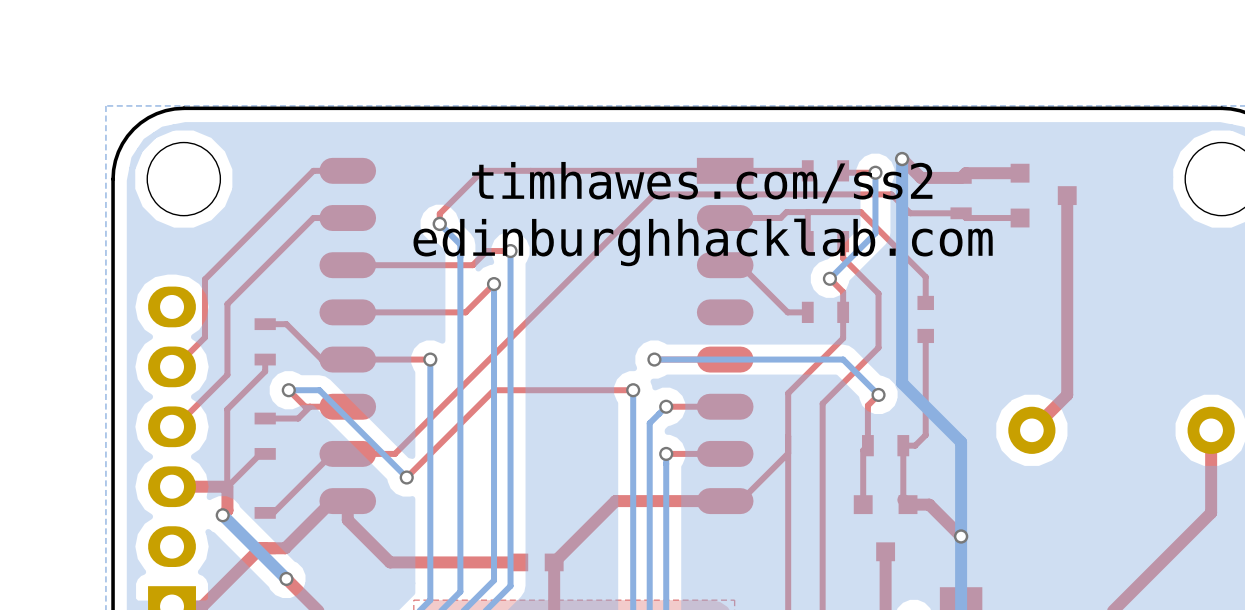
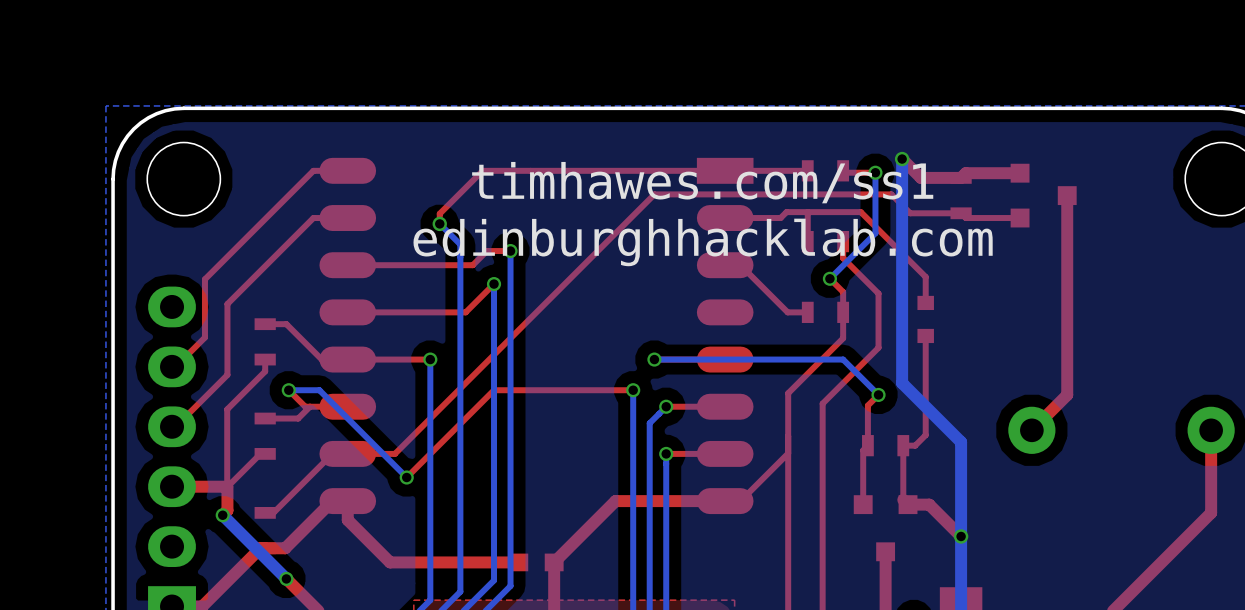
text: timhawes.com/ss2 (702, 182) -> timhawes.com/ss1 (702, 182)

